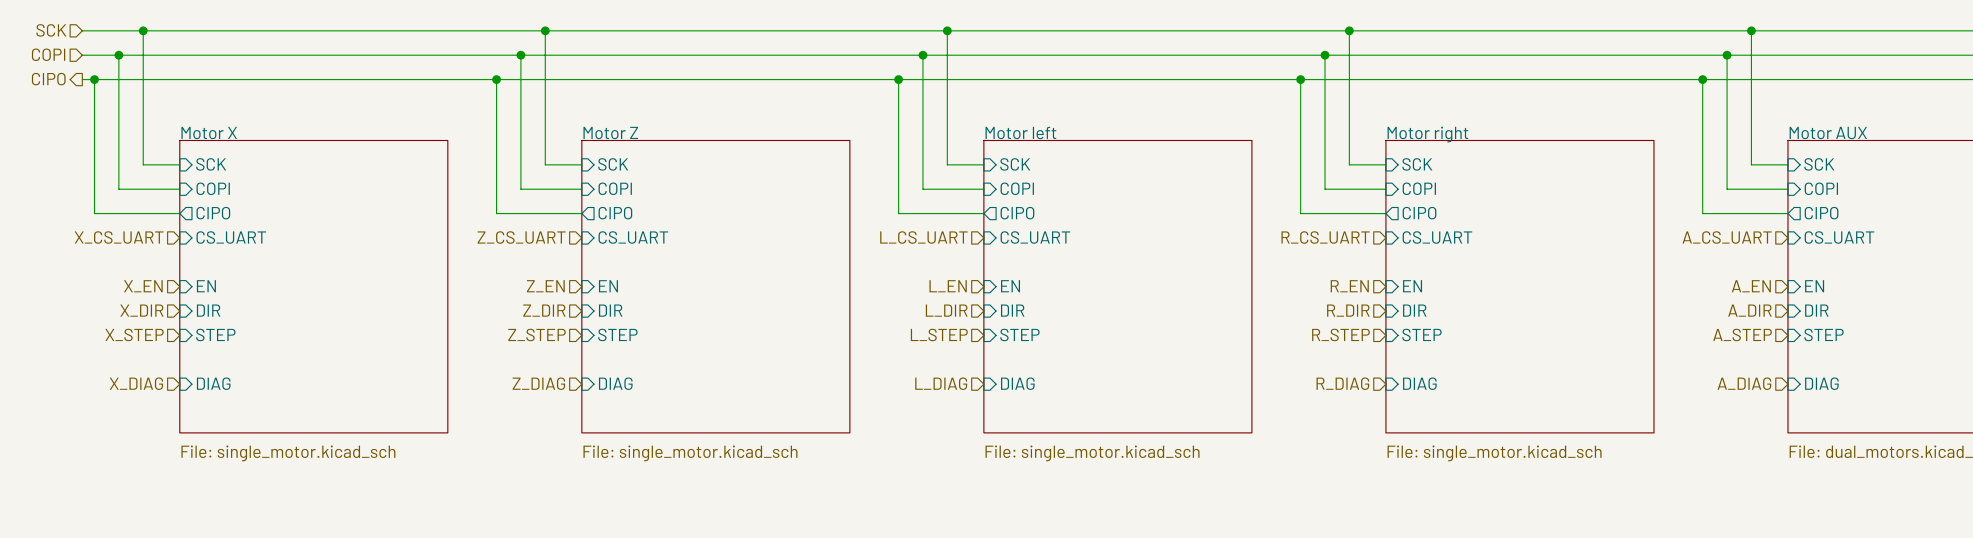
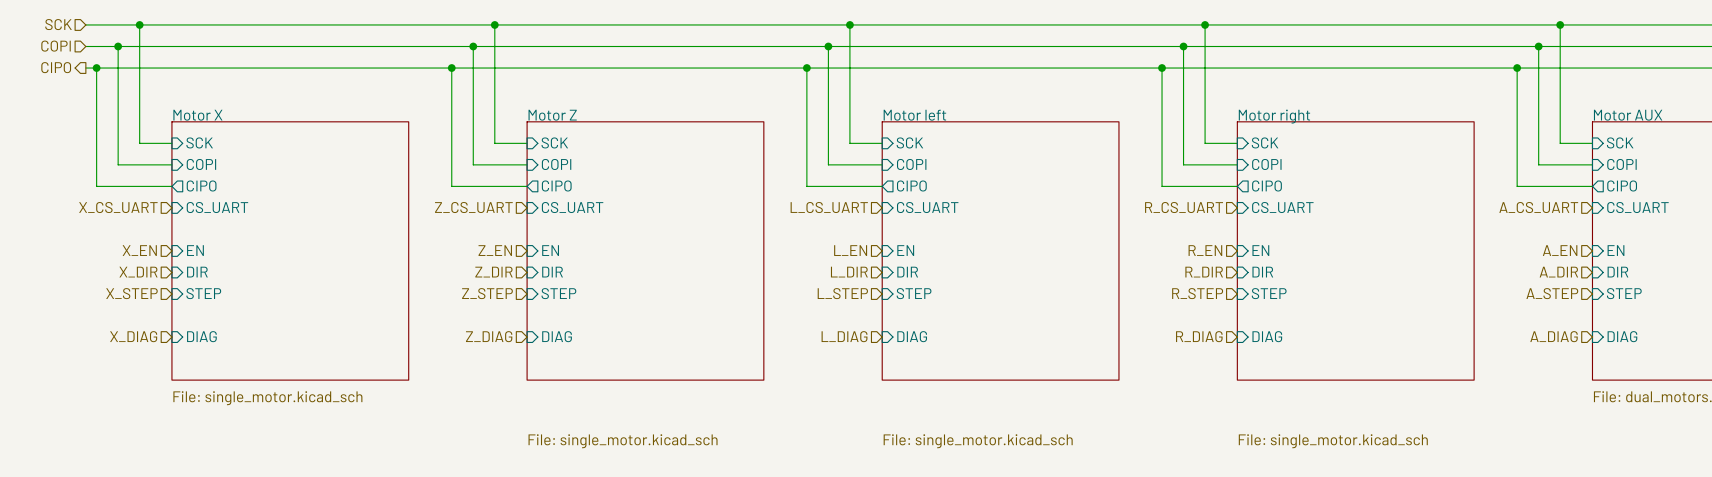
sheet Motor Z value position: File: single_motor.kicad_sch (690, 453) -> File: single_motor.kicad_sch (623, 441)
sheet Motor left value position: File: single_motor.kicad_sch (1092, 453) -> File: single_motor.kicad_sch (978, 441)
sheet Motor right value position: File: single_motor.kicad_sch (1494, 453) -> File: single_motor.kicad_sch (1333, 441)

